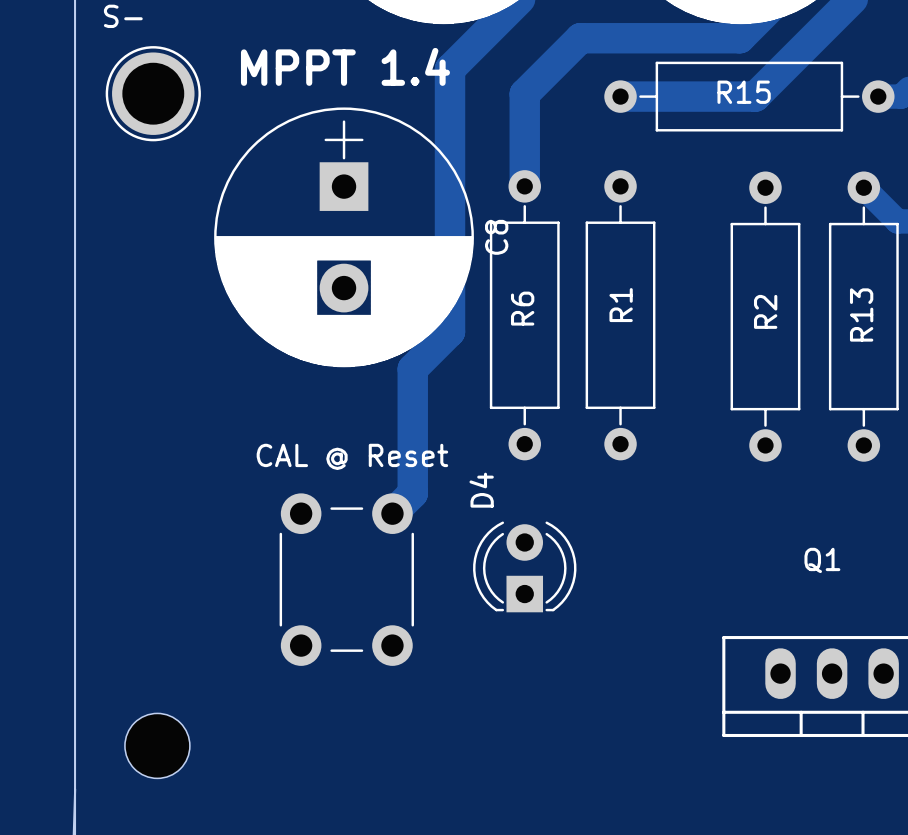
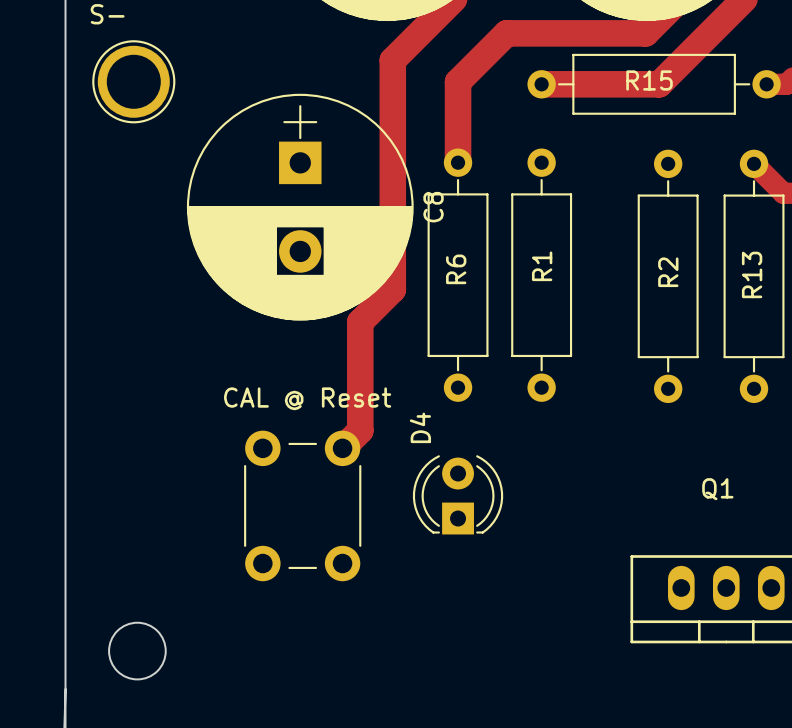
text: MPPT 1.4 (345, 66) -> none

